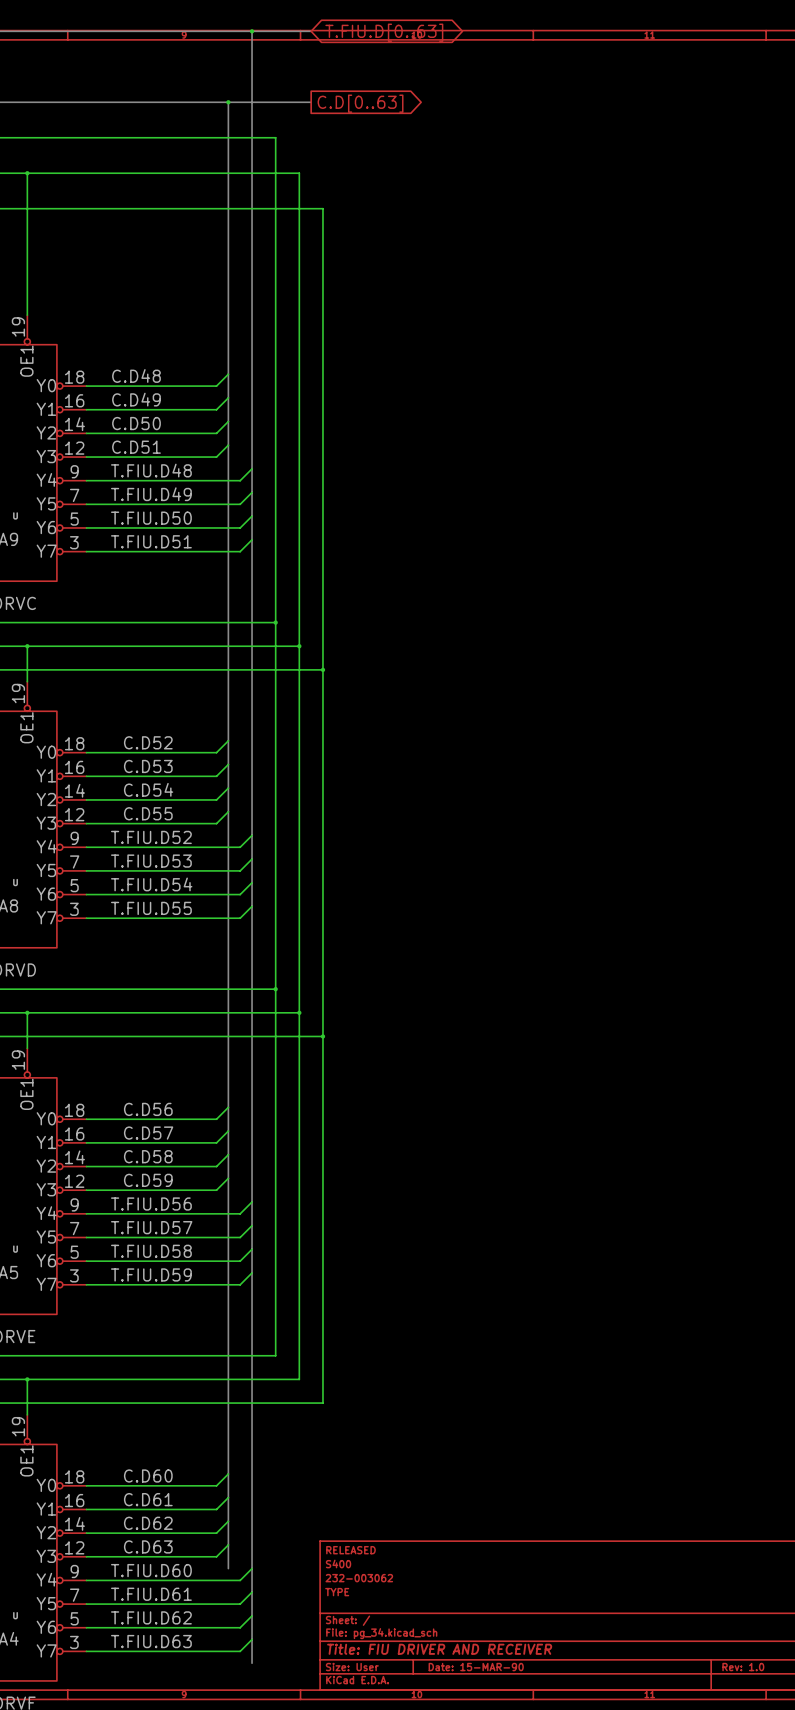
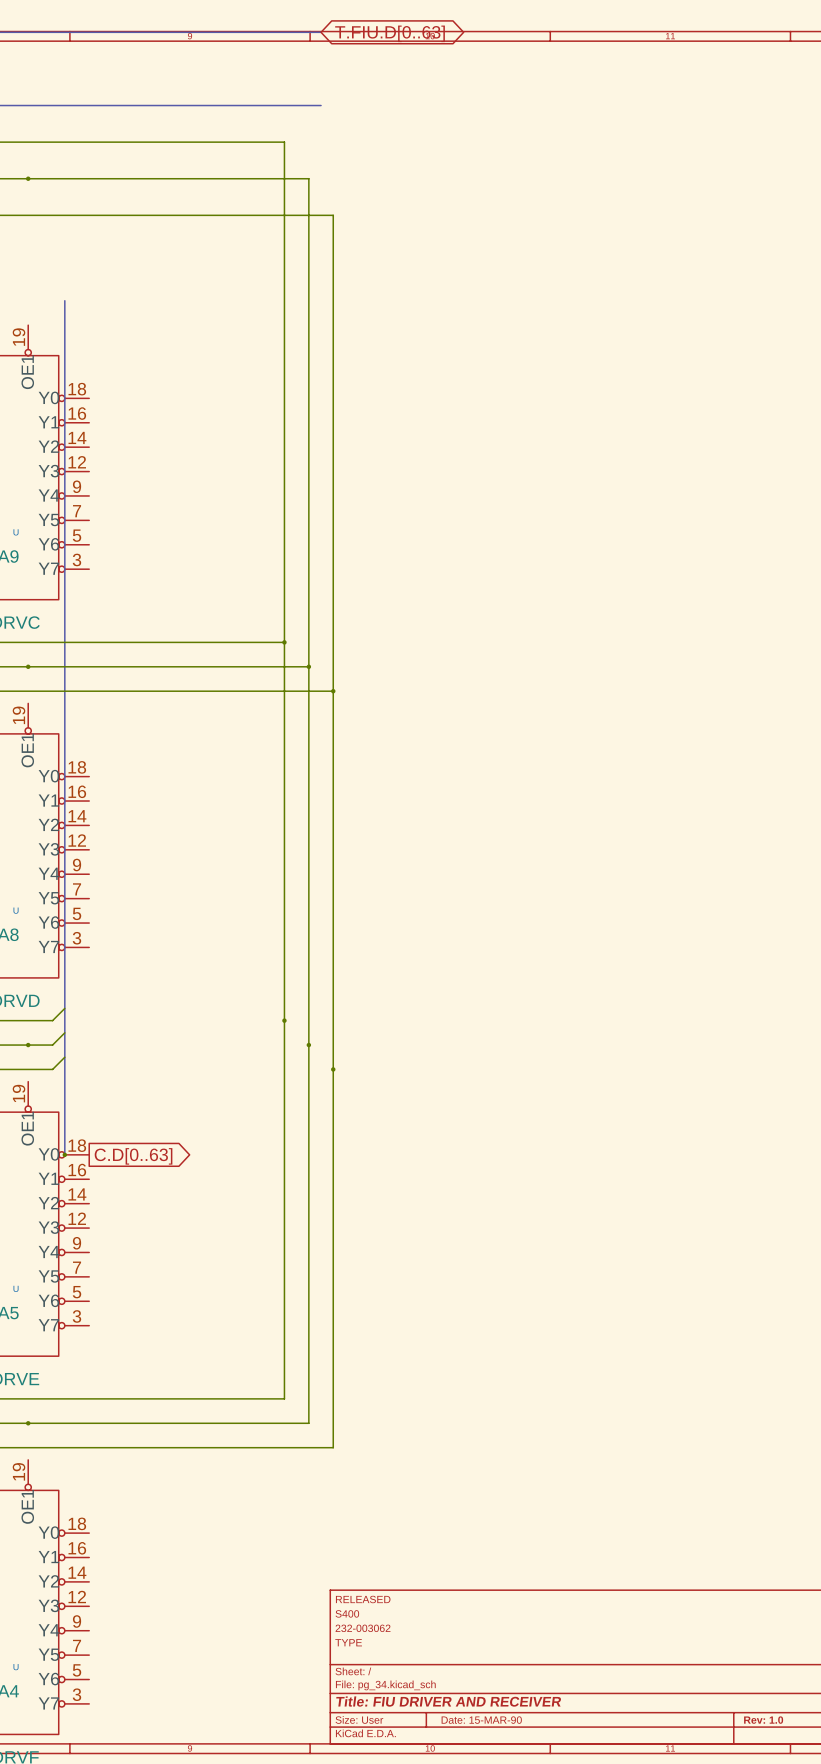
bus: (252, 31) (252, 1663) -> none
junction: (252, 31) -> none
bus: (228, 102) (228, 1568) -> none
junction: (228, 102) -> none
global label: C.D[0..63] (360, 103) -> none
wire: (27, 173) (27, 315) -> none
bus: none -> (64, 300) (64, 1154)
wire: (228, 374) (216, 386) (86, 386) -> none
label: C.D48 (136, 375) -> none
wire: (228, 397) (216, 409) (86, 409) -> none
label: C.D49 (136, 399) -> none
wire: (228, 421) (216, 433) (86, 433) -> none
label: C.D50 (136, 423) -> none
wire: (228, 445) (216, 457) (86, 457) -> none
label: C.D51 (136, 447) -> none
wire: (252, 468) (240, 480) (86, 480) -> none
label: T.FIU.D48 (151, 470) -> none
wire: (252, 492) (240, 504) (86, 504) -> none
label: T.FIU.D49 (151, 494) -> none
wire: (252, 516) (240, 527) (86, 527) -> none
label: T.FIU.D50 (151, 518) -> none
wire: (252, 539) (240, 551) (86, 551) -> none
label: T.FIU.D51 (151, 541) -> none
wire: (27, 646) (27, 681) -> none
wire: (228, 740) (216, 752) (86, 752) -> none
label: C.D52 (148, 742) -> none
wire: (228, 764) (216, 776) (86, 776) -> none
label: C.D53 (148, 766) -> none
wire: (228, 788) (216, 799) (86, 799) -> none
label: C.D54 (148, 789) -> none
wire: (228, 811) (216, 823) (86, 823) -> none
label: C.D55 (148, 813) -> none
wire: (252, 835) (240, 847) (86, 847) -> none
label: T.FIU.D52 (151, 837) -> none
wire: (252, 859) (240, 870) (86, 870) -> none
label: T.FIU.D53 (151, 861) -> none
wire: (252, 882) (240, 894) (86, 894) -> none
label: T.FIU.D54 (151, 884) -> none
wire: (252, 906) (240, 918) (86, 918) -> none
label: T.FIU.D55 (151, 908) -> none
wire: (50, 989) (275, 989) -> (52, 1020) (64, 1008)
wire: (27, 1012) (27, 1048) -> none
wire: (50, 1012) (299, 1012) -> (52, 1045) (64, 1032)
wire: (50, 1036) (322, 1036) -> (52, 1069) (64, 1057)
wire: (228, 1107) (216, 1119) (86, 1119) -> none
label: C.D56 (148, 1109) -> none
junction: none -> (64, 1154)
global label: none -> C.D[0..63] (133, 1156)
wire: (228, 1131) (216, 1142) (86, 1142) -> none
label: C.D57 (148, 1133) -> none
wire: (228, 1154) (216, 1166) (86, 1166) -> none
label: C.D58 (148, 1156) -> none
wire: (228, 1178) (216, 1190) (86, 1190) -> none
label: C.D59 (148, 1180) -> none
wire: (252, 1202) (240, 1213) (86, 1213) -> none
label: T.FIU.D56 (151, 1204) -> none
wire: (252, 1225) (240, 1237) (86, 1237) -> none
label: T.FIU.D57 (151, 1227) -> none
wire: (252, 1249) (240, 1261) (86, 1261) -> none
label: T.FIU.D58 (151, 1251) -> none
wire: (252, 1272) (240, 1284) (86, 1284) -> none
label: T.FIU.D59 (151, 1274) -> none
wire: (27, 1379) (27, 1414) -> none
wire: (228, 1474) (216, 1485) (86, 1485) -> none
label: C.D60 (148, 1475) -> none
wire: (228, 1497) (216, 1509) (86, 1509) -> none
label: C.D61 (148, 1499) -> none
wire: (228, 1521) (216, 1533) (86, 1533) -> none
label: C.D62 (148, 1523) -> none
wire: (228, 1544) (216, 1556) (86, 1556) -> none
label: C.D63 (148, 1546) -> none
wire: (252, 1568) (240, 1580) (86, 1580) -> none
label: T.FIU.D60 (151, 1570) -> none
wire: (252, 1592) (240, 1604) (86, 1604) -> none
label: T.FIU.D61 (151, 1594) -> none
wire: (252, 1615) (240, 1627) (86, 1627) -> none
label: T.FIU.D62 (151, 1617) -> none
wire: (252, 1639) (240, 1651) (86, 1651) -> none
label: T.FIU.D63 (151, 1641) -> none

